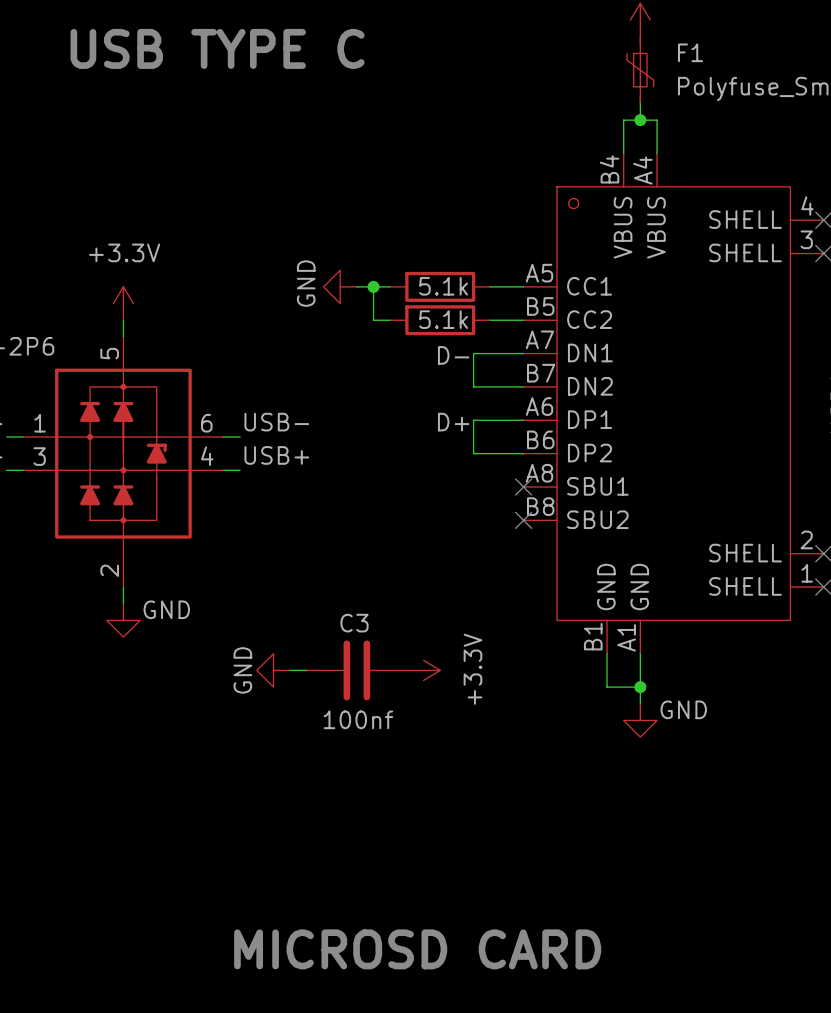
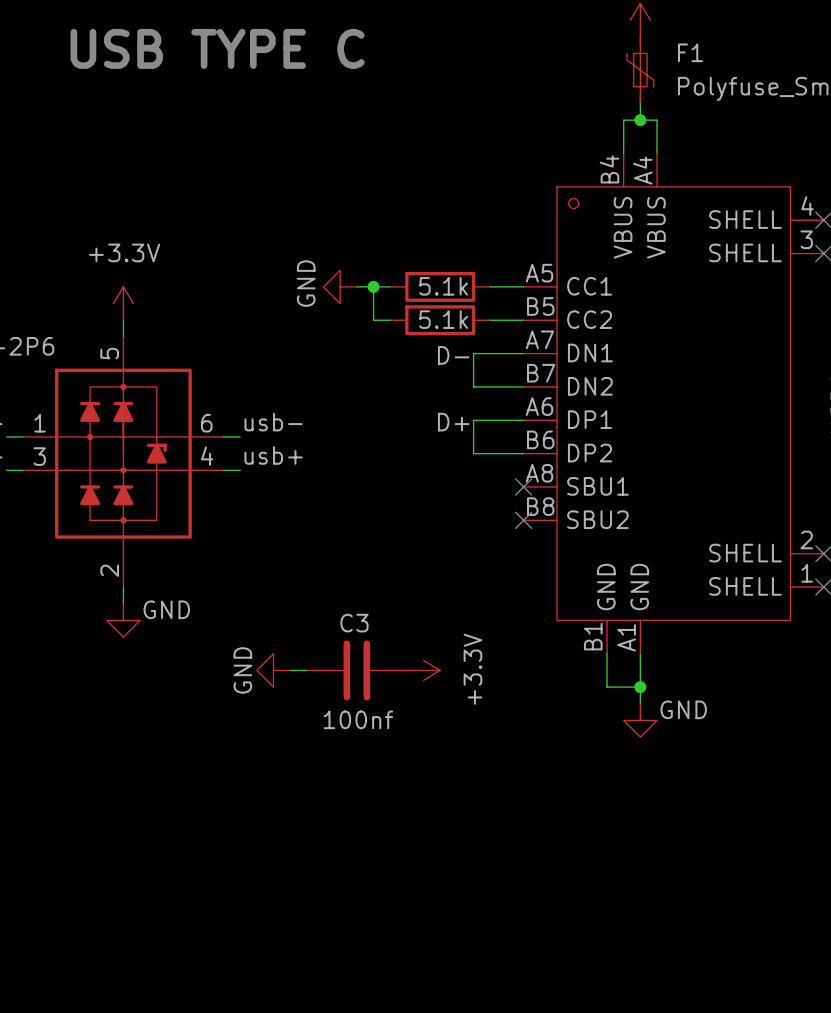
label: USB- (276, 422) -> usb- (273, 422)
label: USB+ (276, 455) -> usb+ (273, 455)
text: MICROSD CARD (417, 949) -> none

